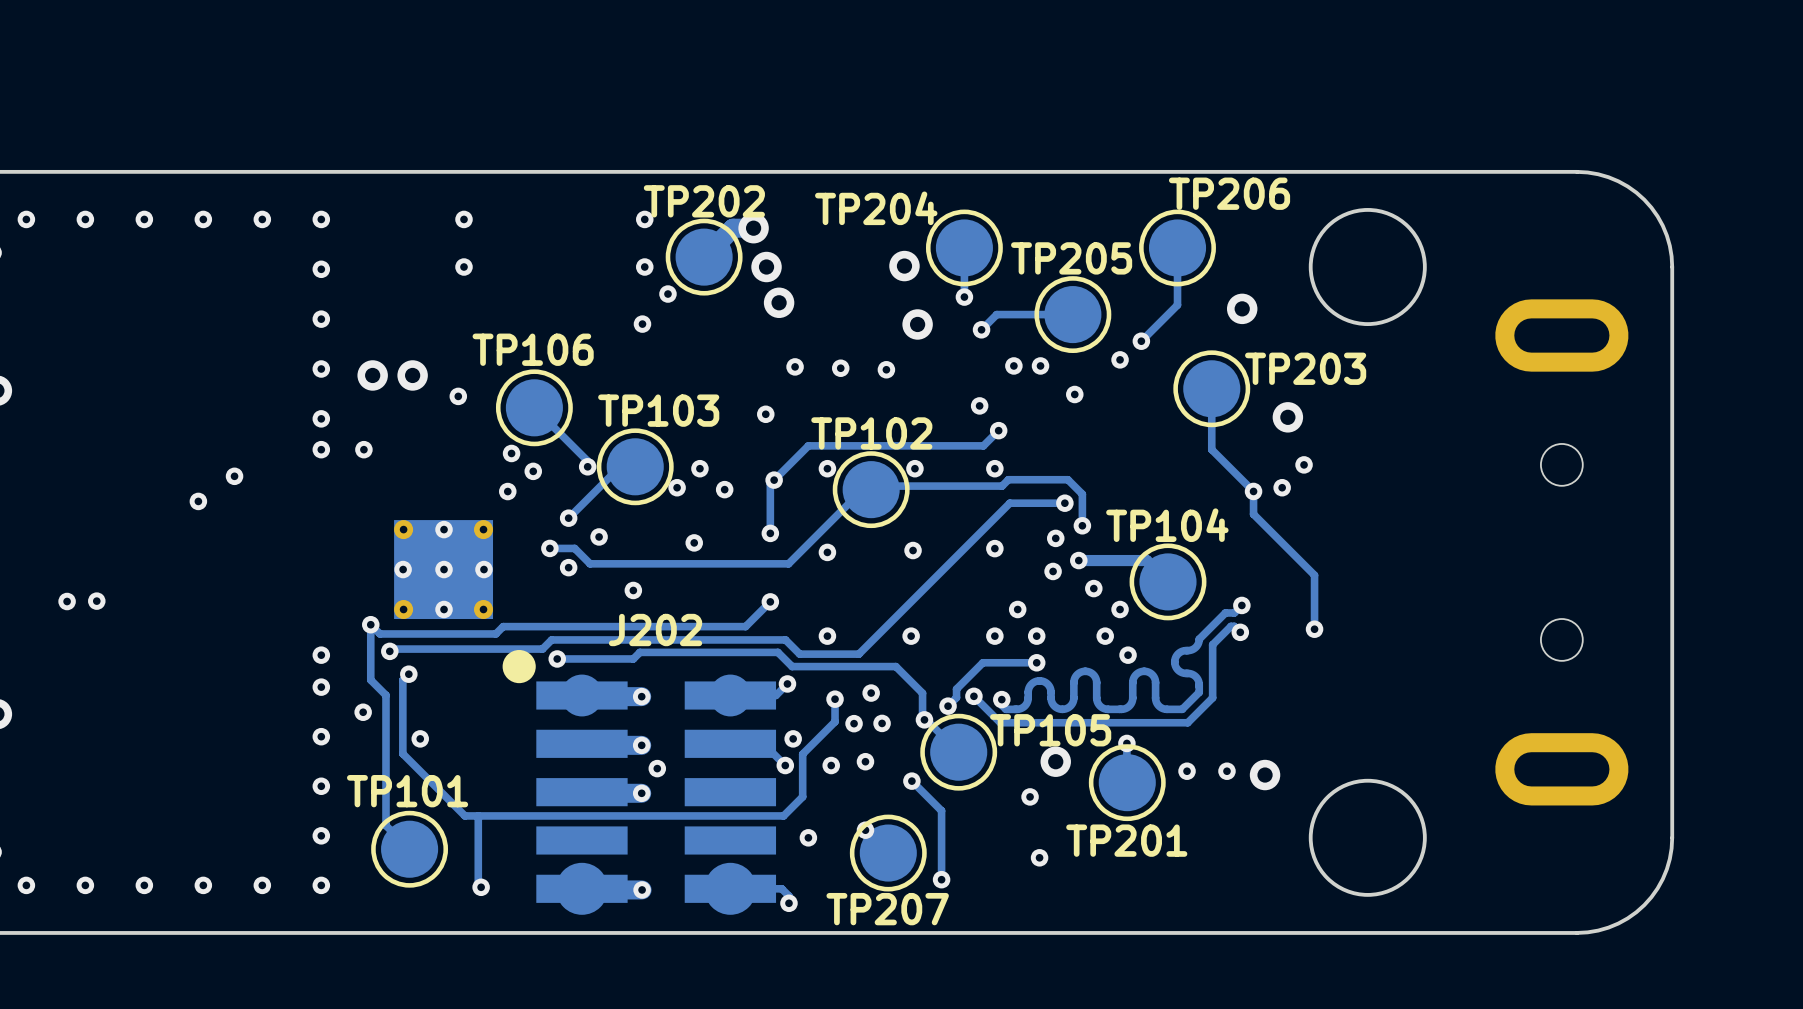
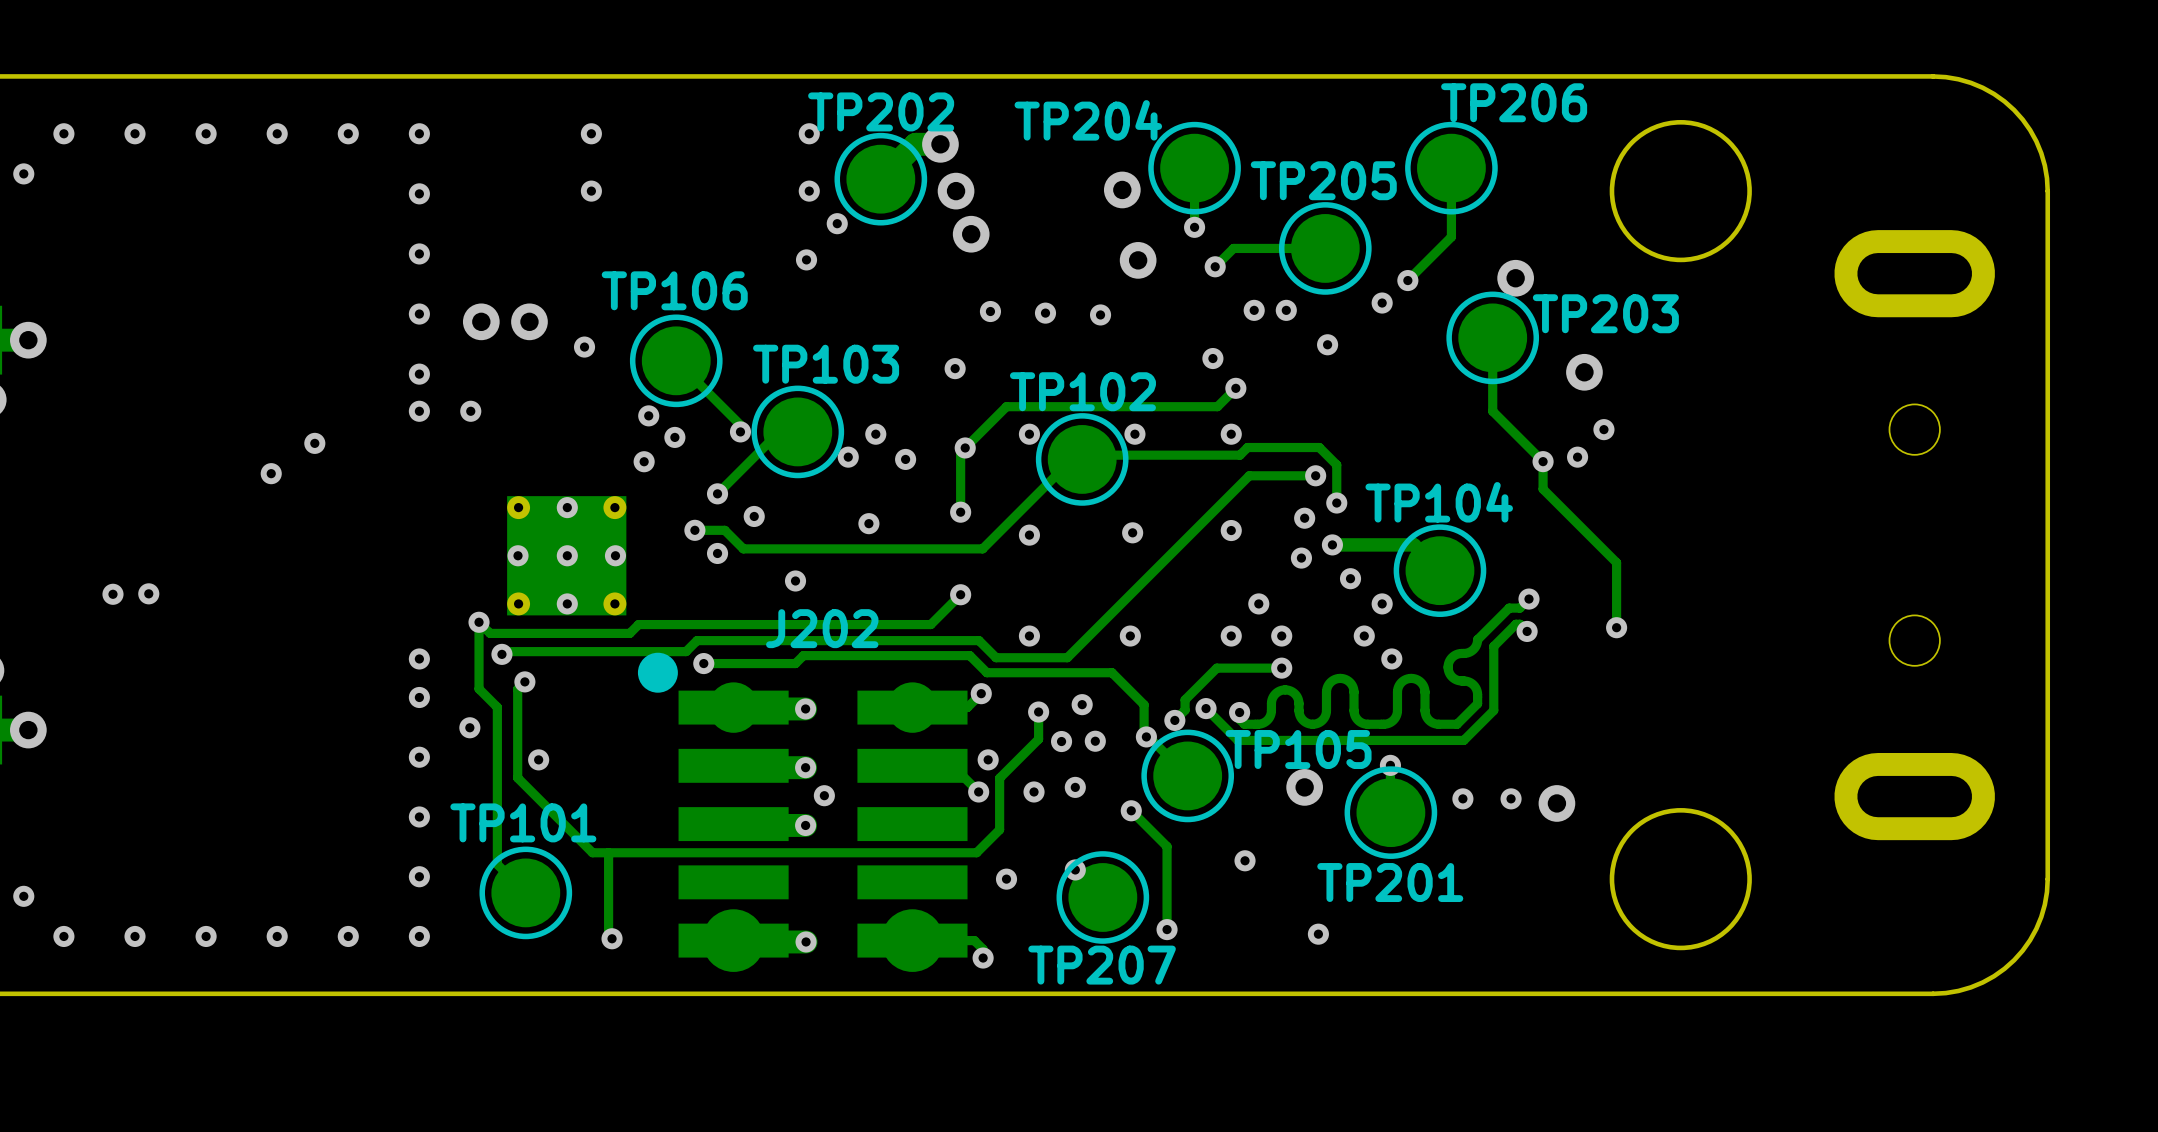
via position: (1242, 308) -> (1515, 278)
via: (1030, 796) -> none
via: none -> (1245, 860)
via: (1039, 857) -> none
via: none -> (1318, 934)

